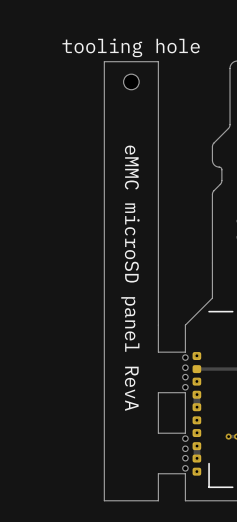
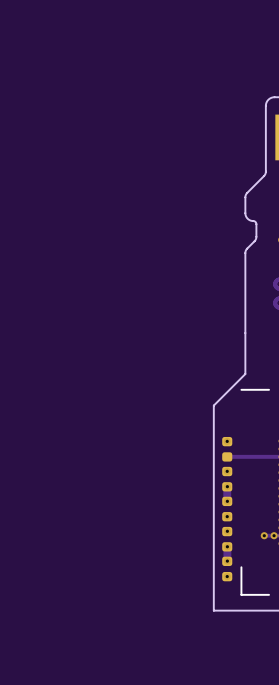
part: (131, 81) -> none
text: eMMC microSD panel RevA (130, 278) -> none
board edge: (185, 352) (158, 352) (158, 61) (104, 61) (104, 500) (158, 500) (158, 473) (185, 473) -> (213, 437) (213, 484)
part: (185, 357) -> none
part: (185, 367) -> none
part: (185, 377) -> none
part: (185, 387) -> none
board edge: (185, 392) (158, 392) (158, 433) (185, 433) -> (213, 579) (213, 531)
part: (185, 438) -> none
part: (185, 448) -> none
part: (185, 458) -> none
part: (185, 468) -> none

